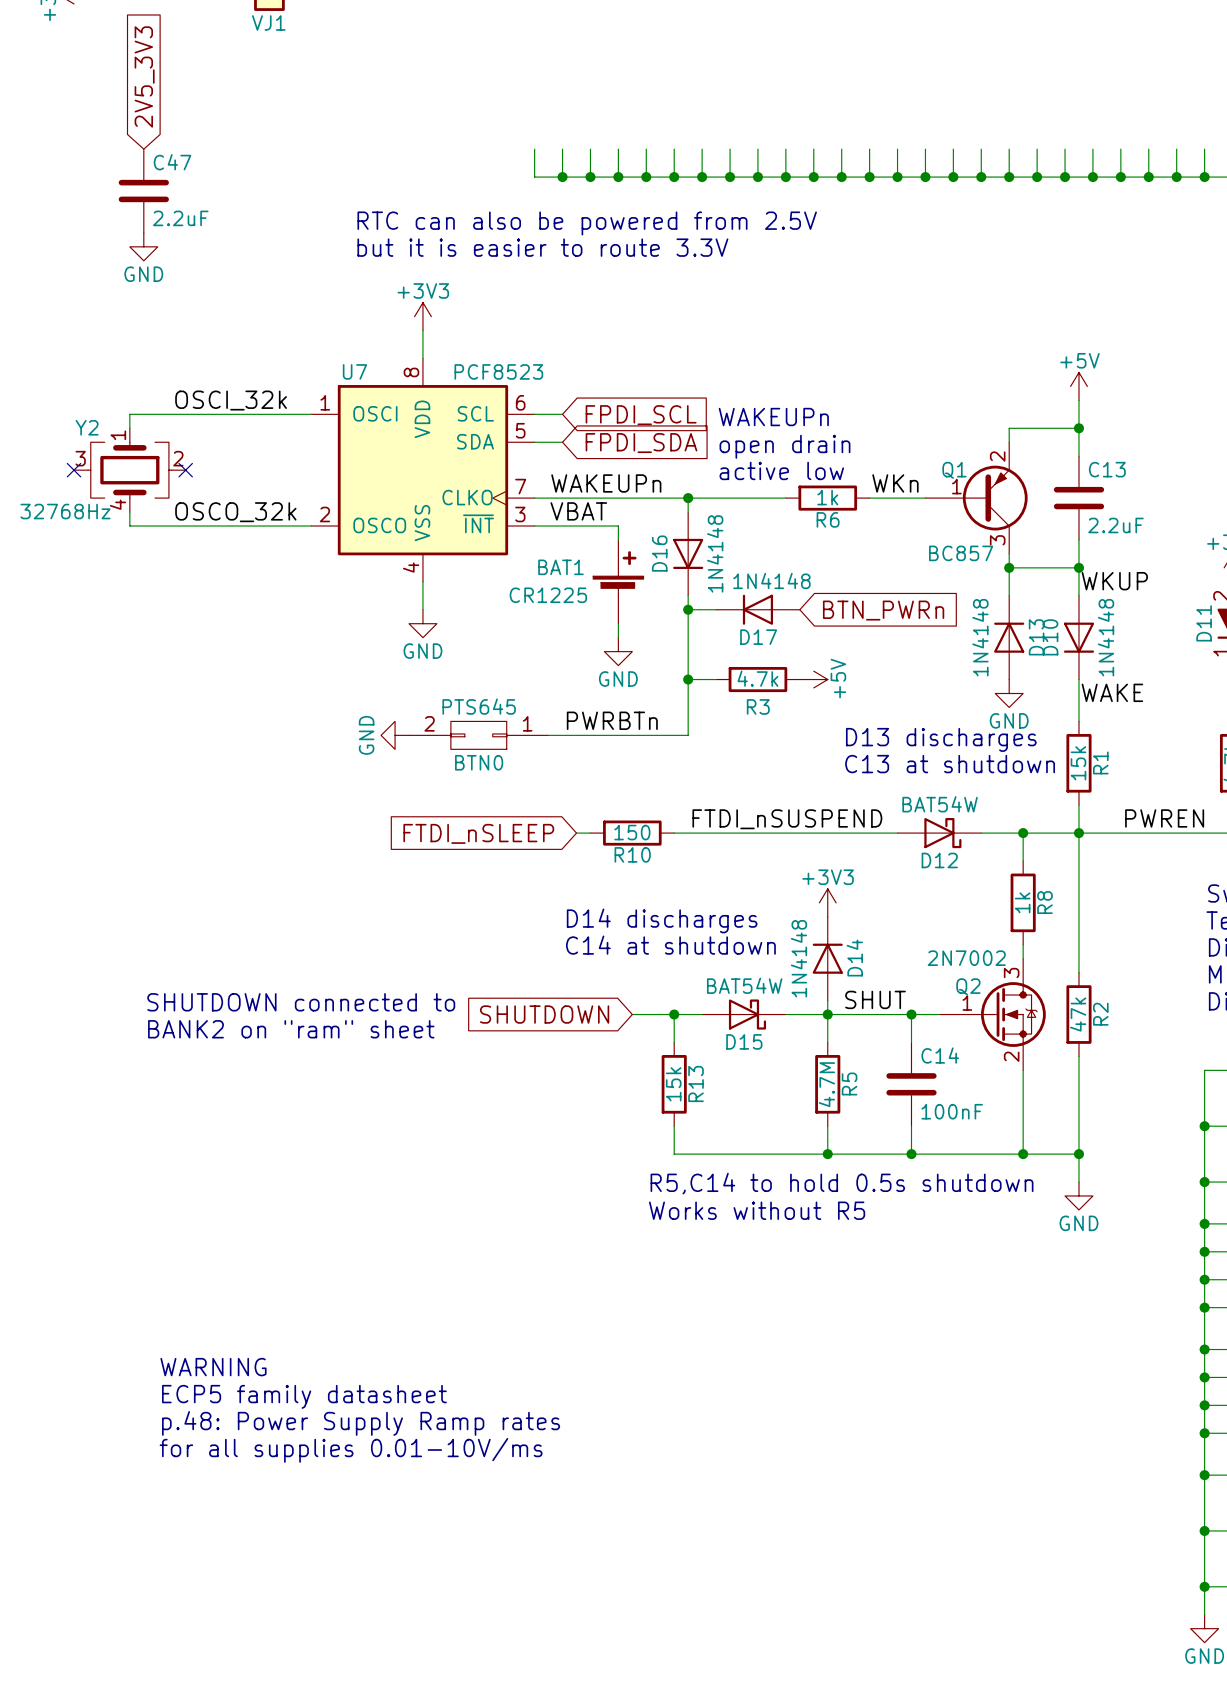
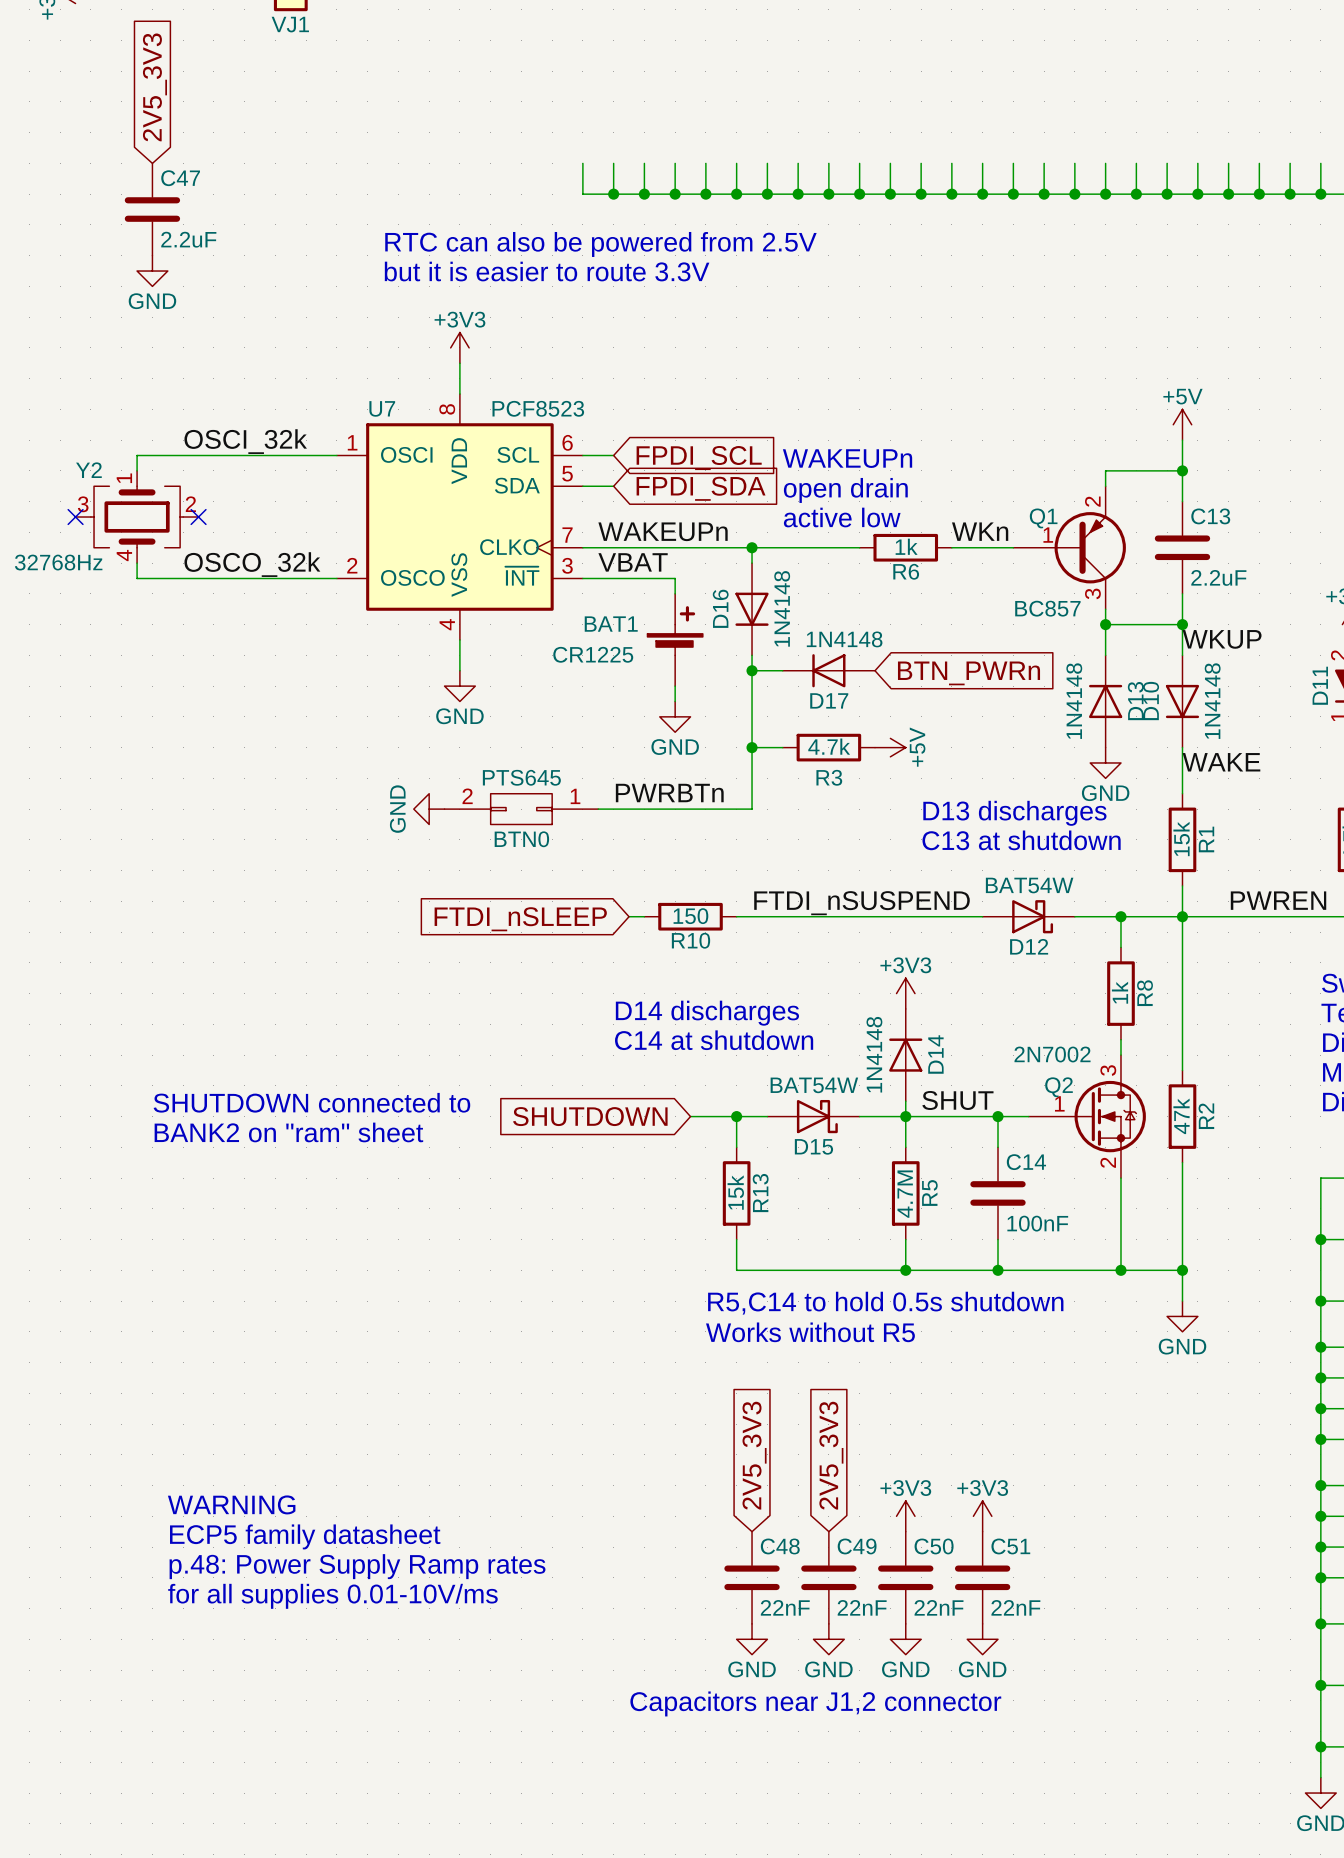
global label: none -> 2V5_3V3 (754, 1455)
global label: none -> 2V5_3V3 (831, 1455)
power symbol: none -> +3V3 (905, 1516)
power symbol: none -> +3V3 (982, 1516)
C48: none -> 22nF (752, 1577)
C49: none -> 22nF (828, 1577)
C50: none -> 22nF (905, 1577)
C51: none -> 22nF (982, 1577)
power symbol: none -> GND (752, 1639)
power symbol: none -> GND (828, 1639)
power symbol: none -> GND (905, 1639)
power symbol: none -> GND (982, 1639)
text: none -> Capacitors near J1,2 connector (815, 1703)

